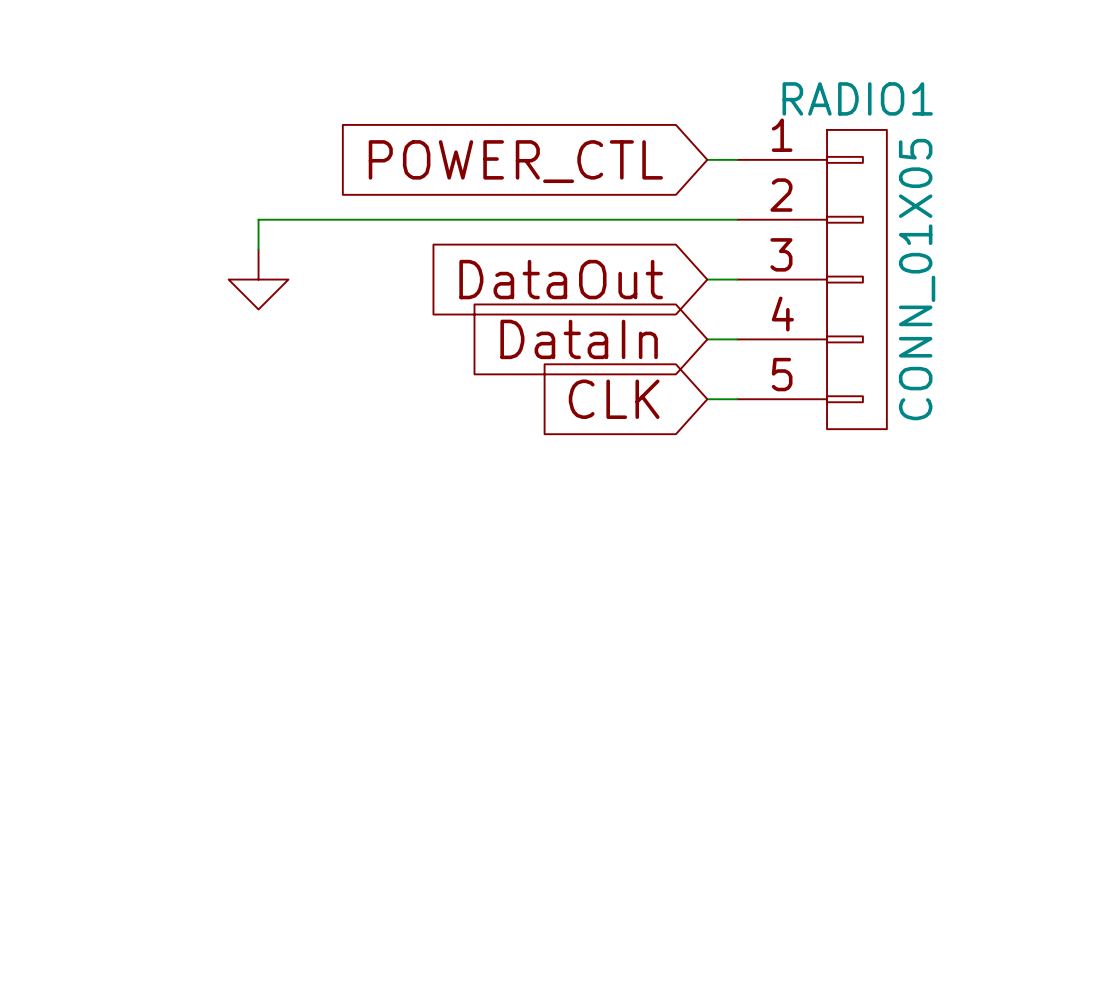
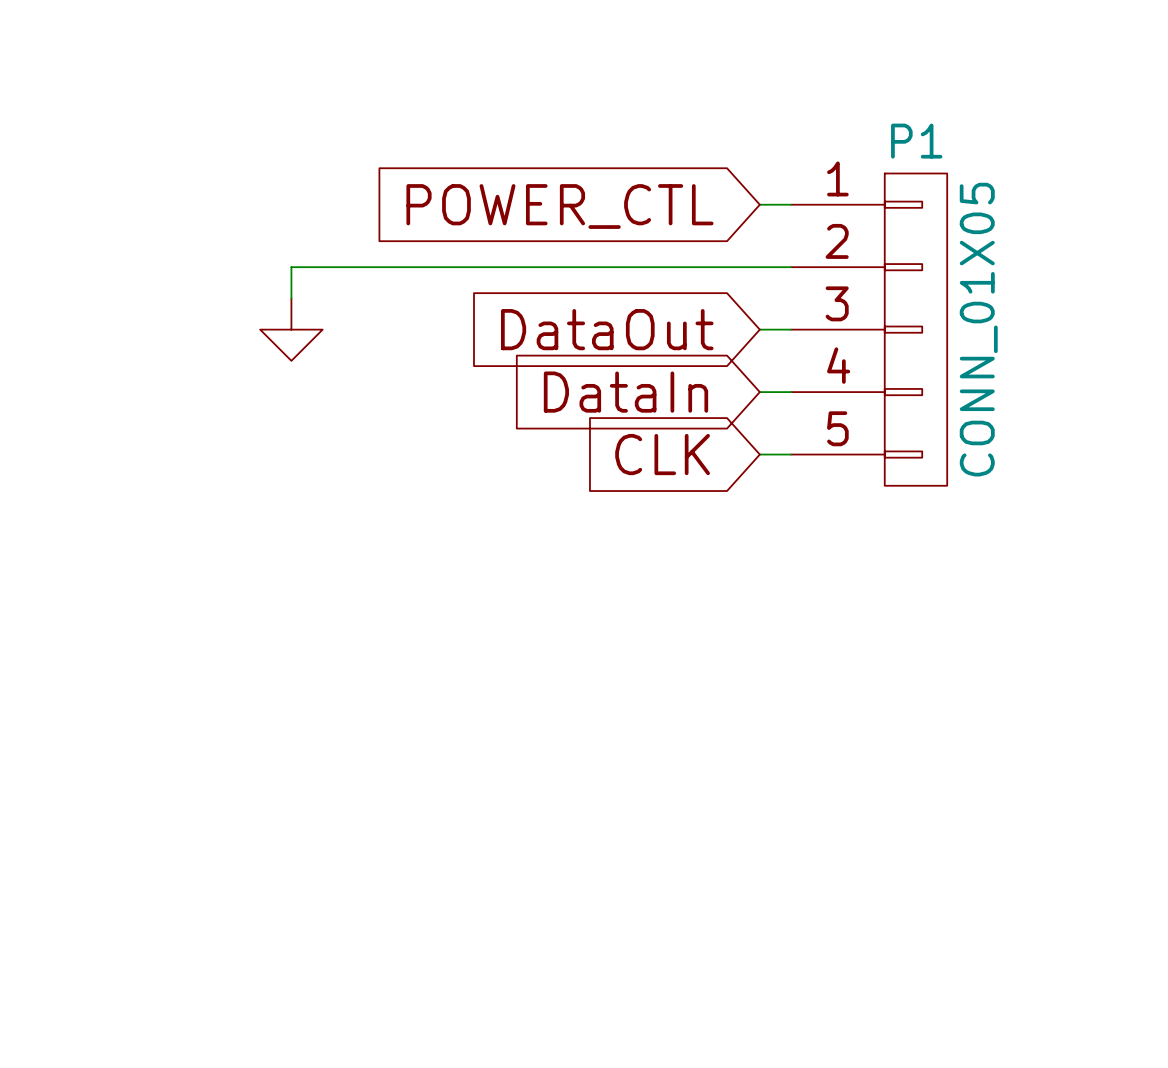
RADIO1 name: RADIO1 (857, 98) -> P1 (916, 141)

